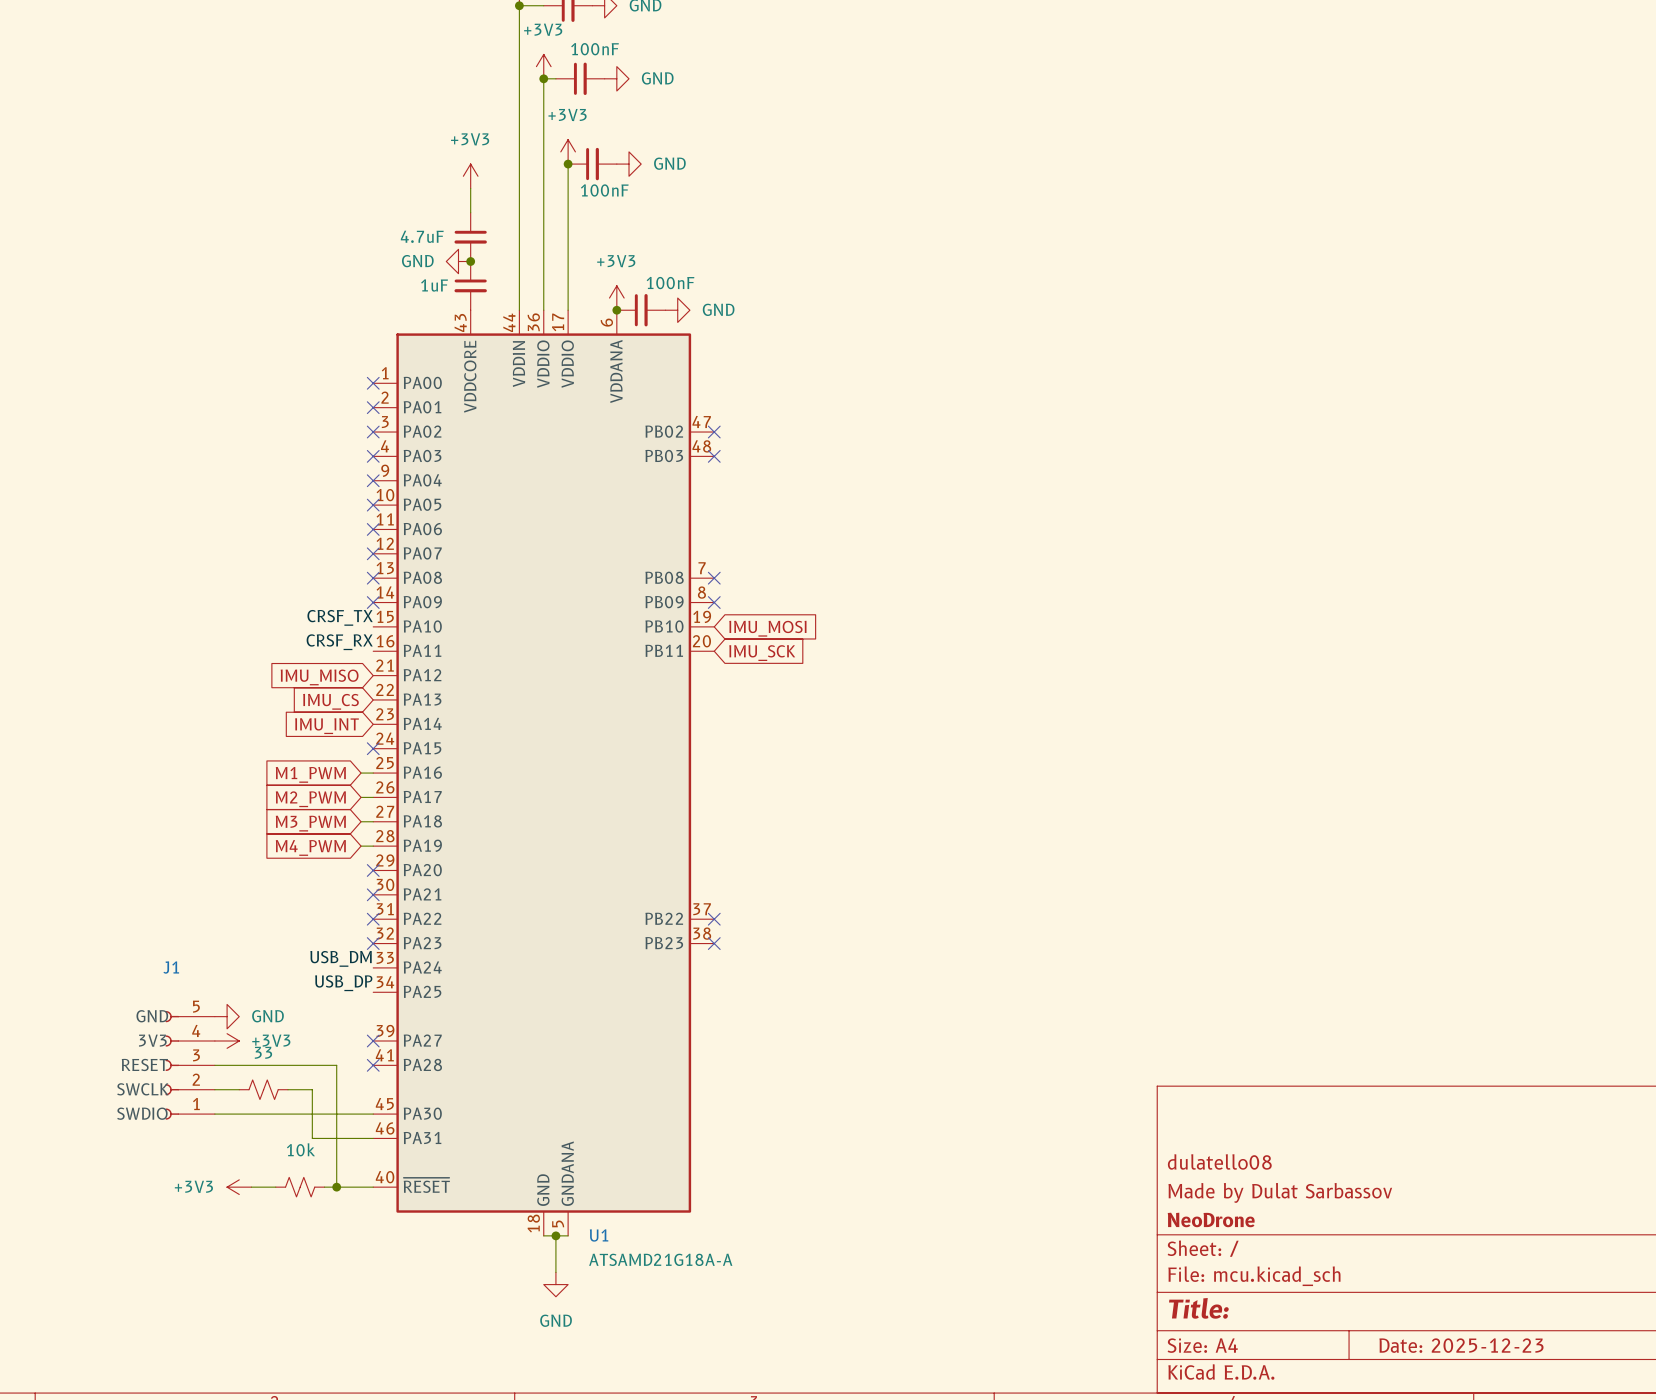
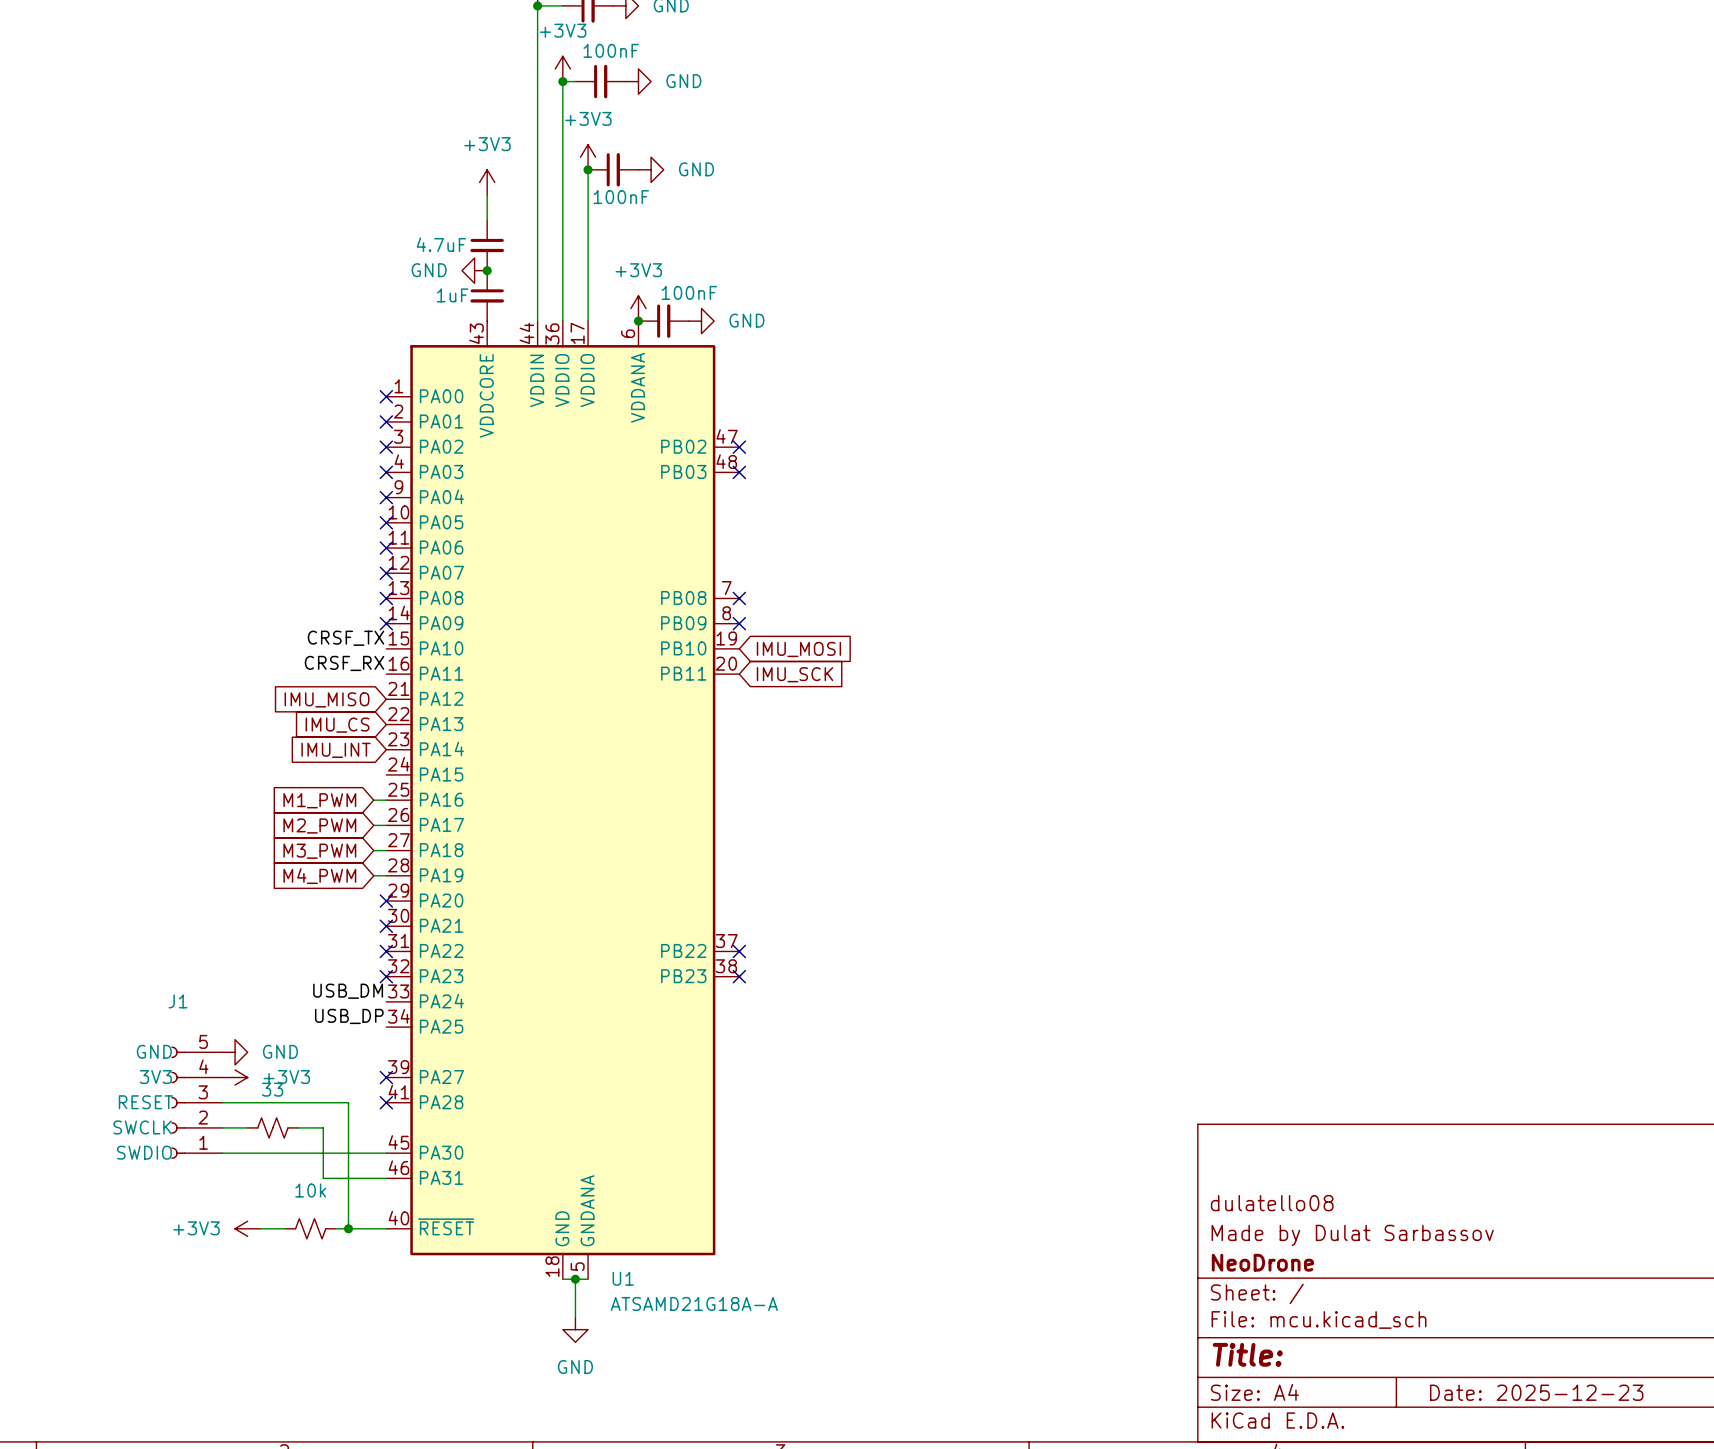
no-connect mark: (373, 748) -> none

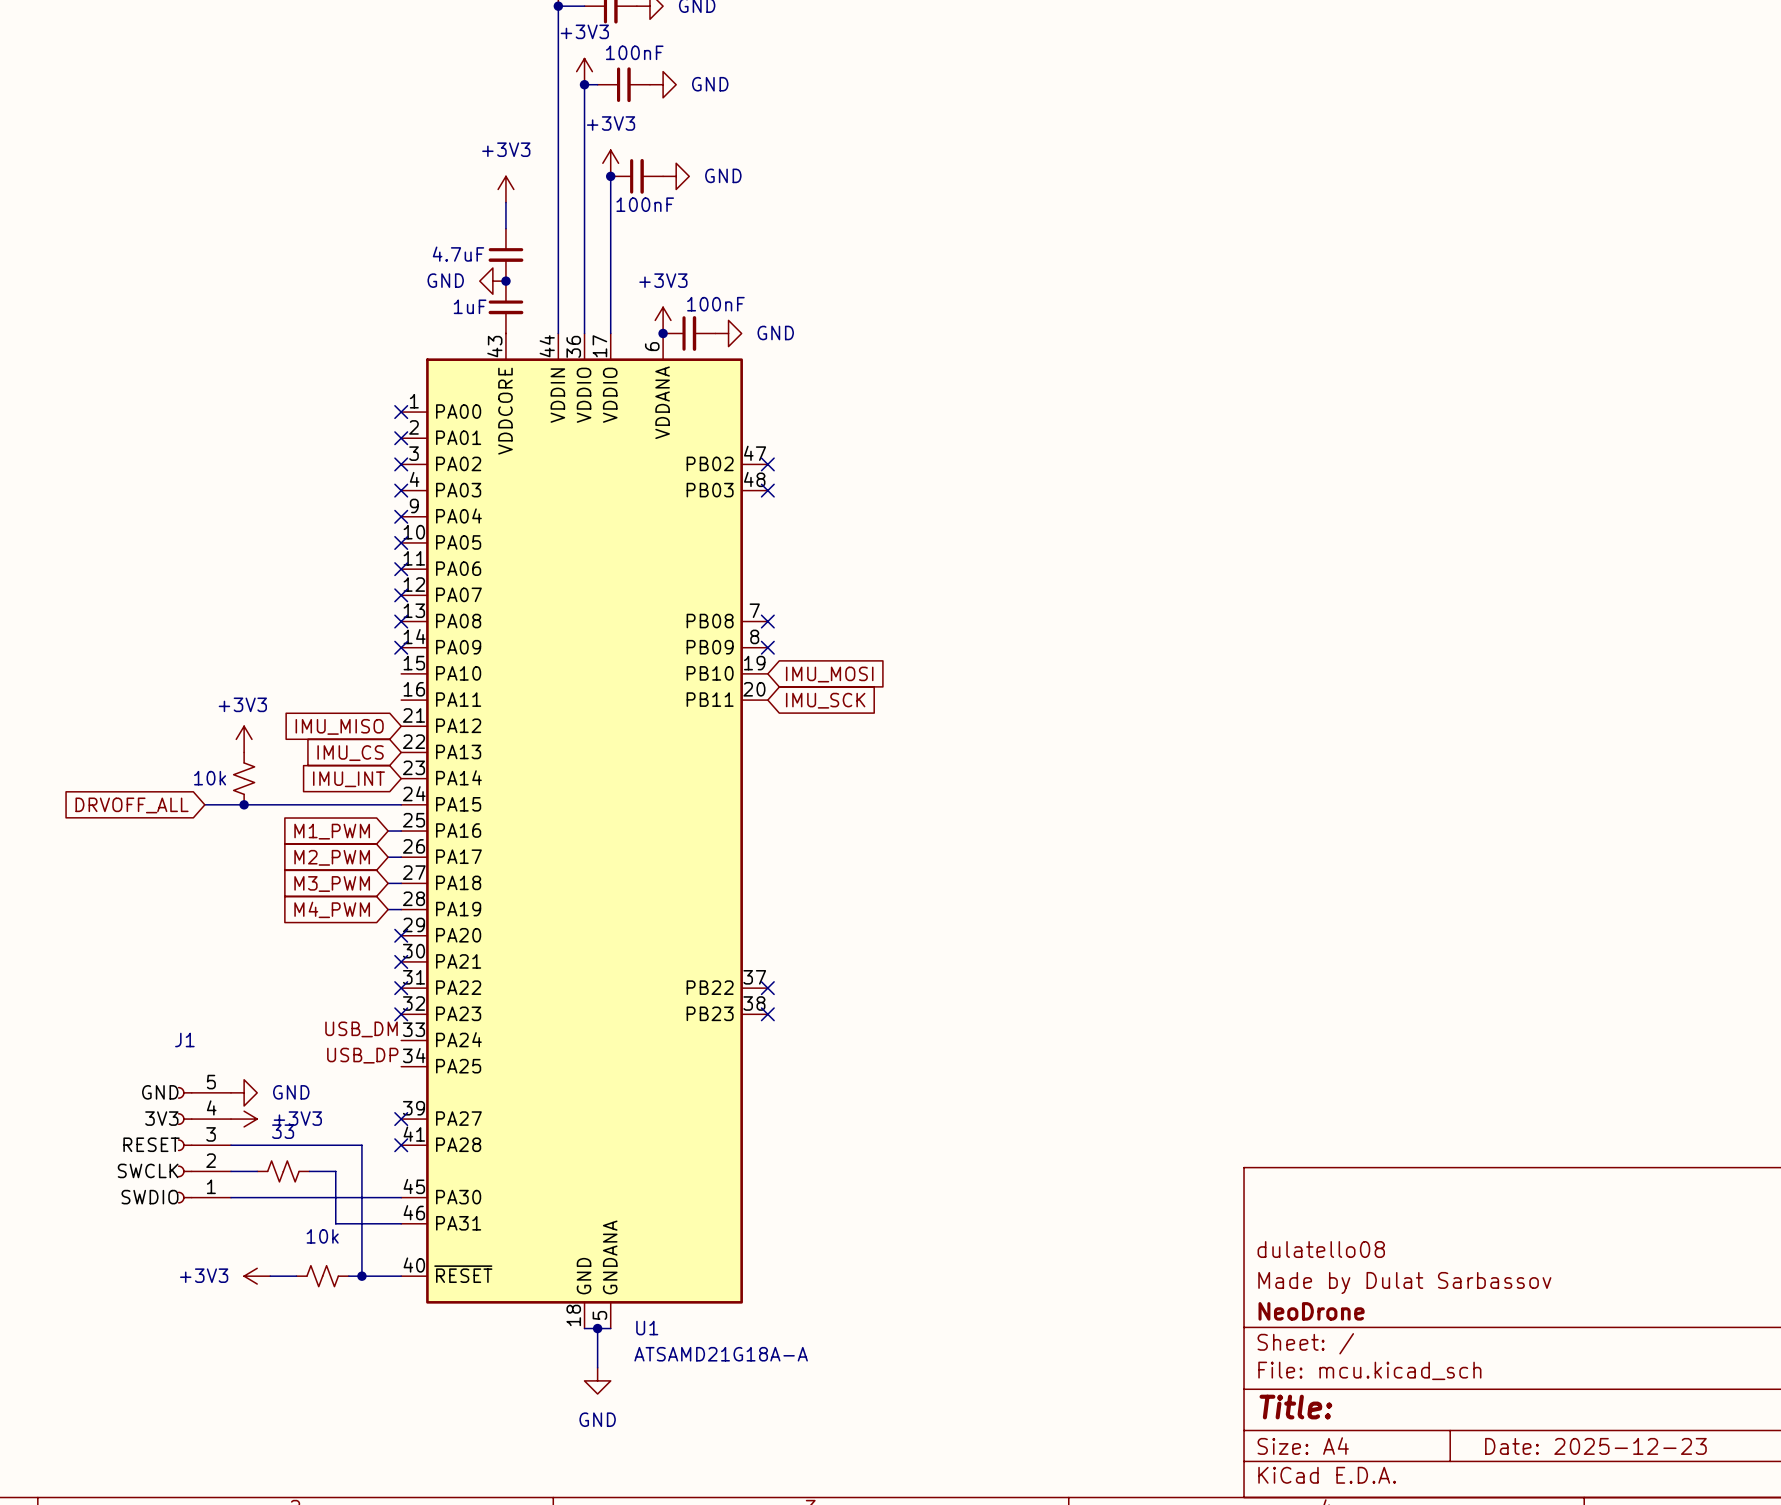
label: CRSF_TX (346, 638) -> none
label: CRSF_RX (344, 663) -> none
power symbol: none -> +3V3 (244, 739)
part: none -> 10k (244, 778)
wire: none -> (204, 804) (401, 804)
junction: none -> (244, 804)
global label: none -> DRVOFF_ALL (132, 805)

